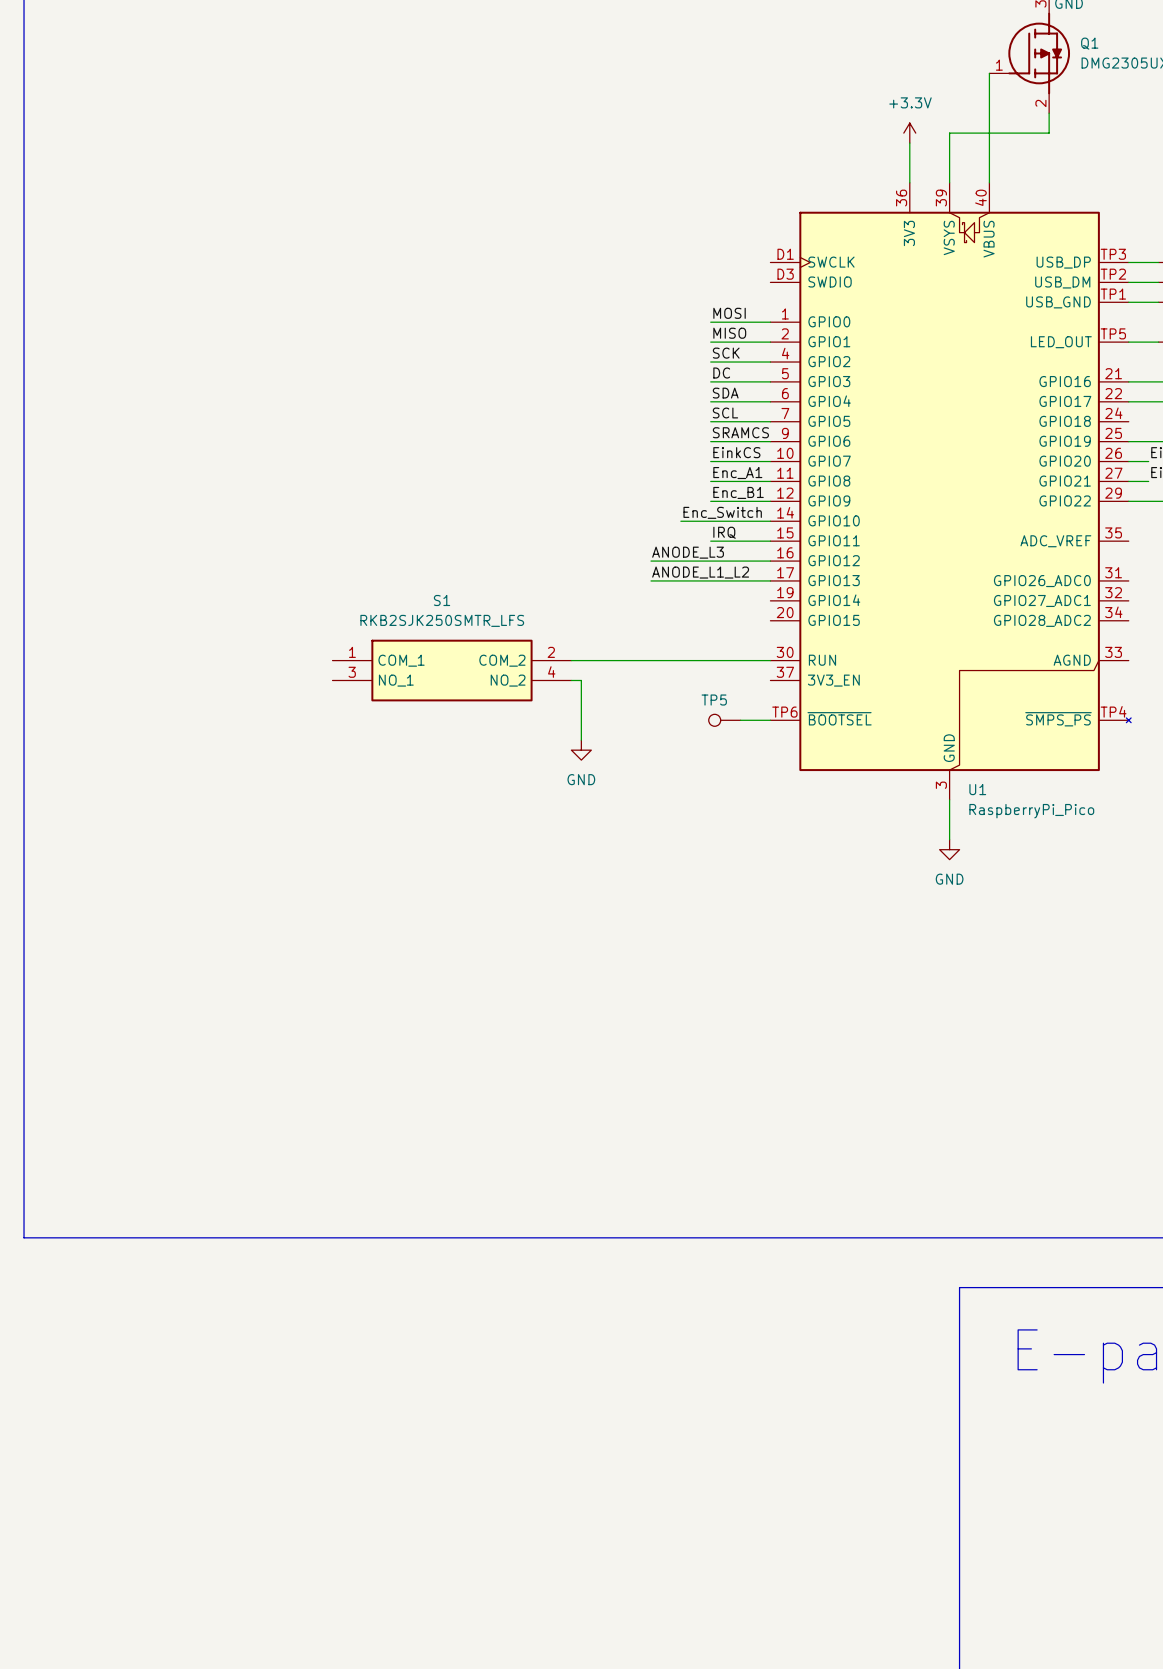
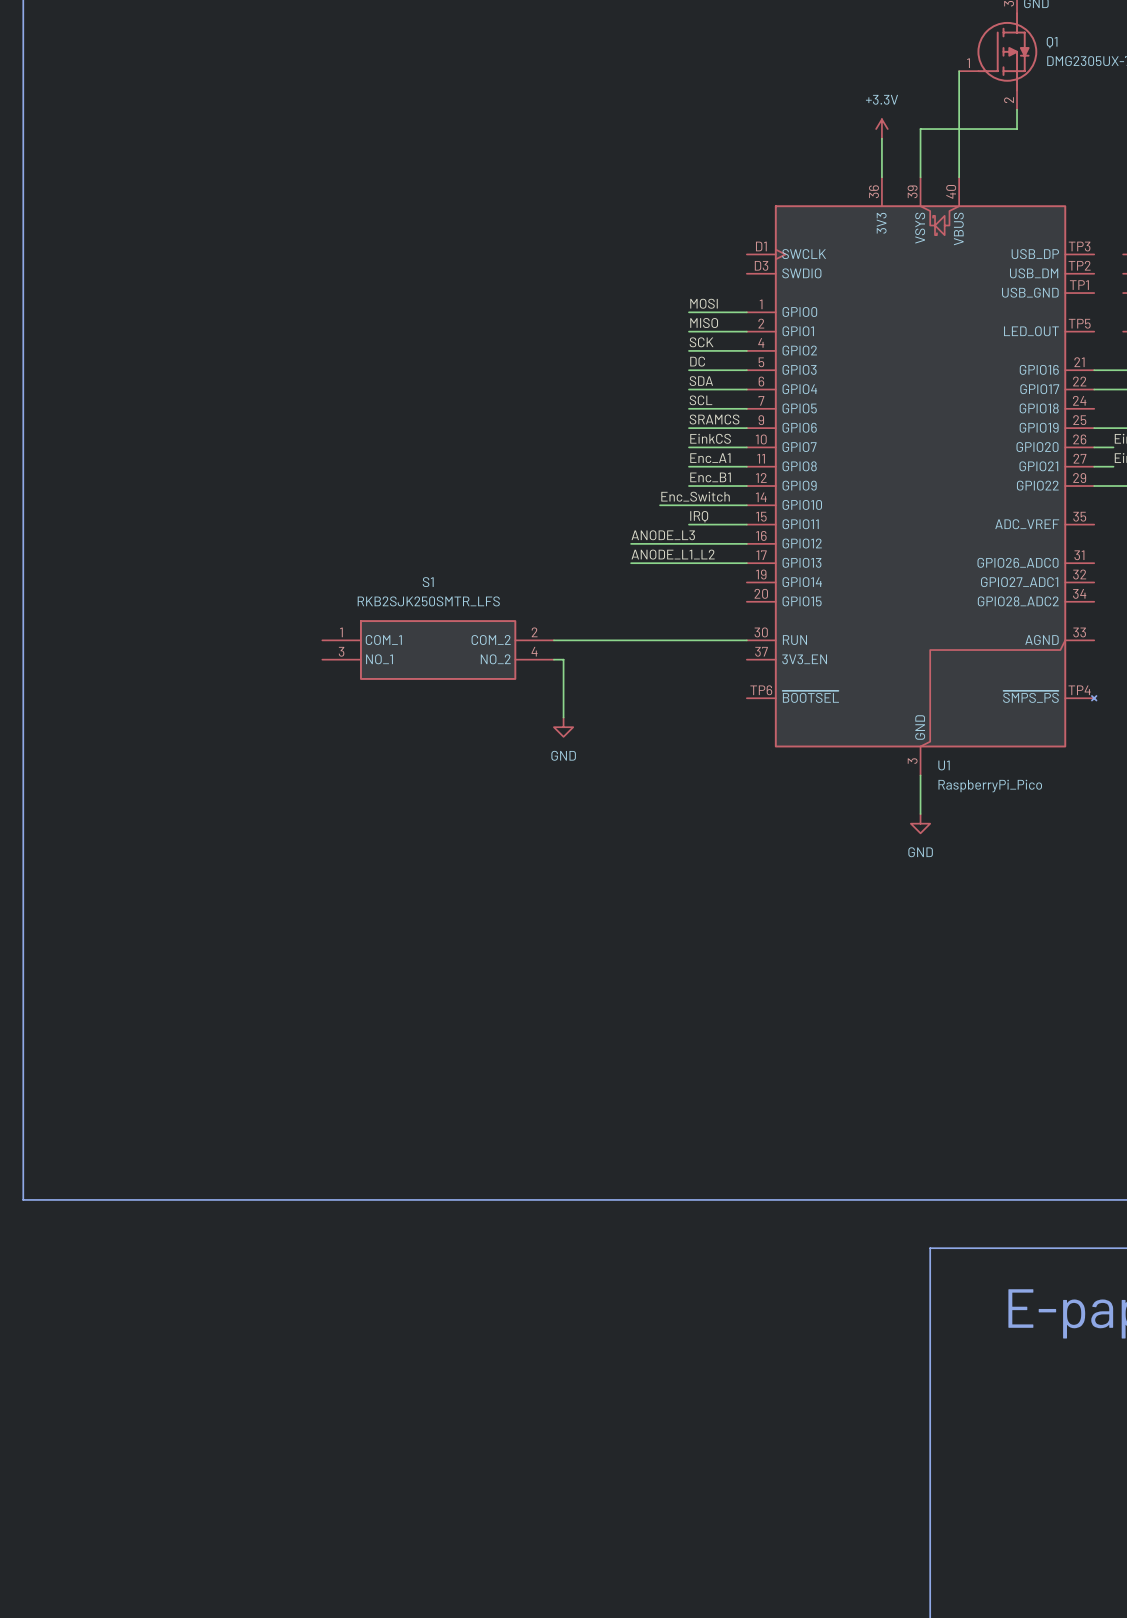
wire: (1128, 262) (1158, 262) -> none
wire: (1128, 282) (1158, 282) -> none
wire: (1128, 302) (1158, 302) -> none
wire: (1128, 342) (1158, 342) -> none
TP5: (724, 720) -> none
wire: (740, 720) (770, 720) -> none

